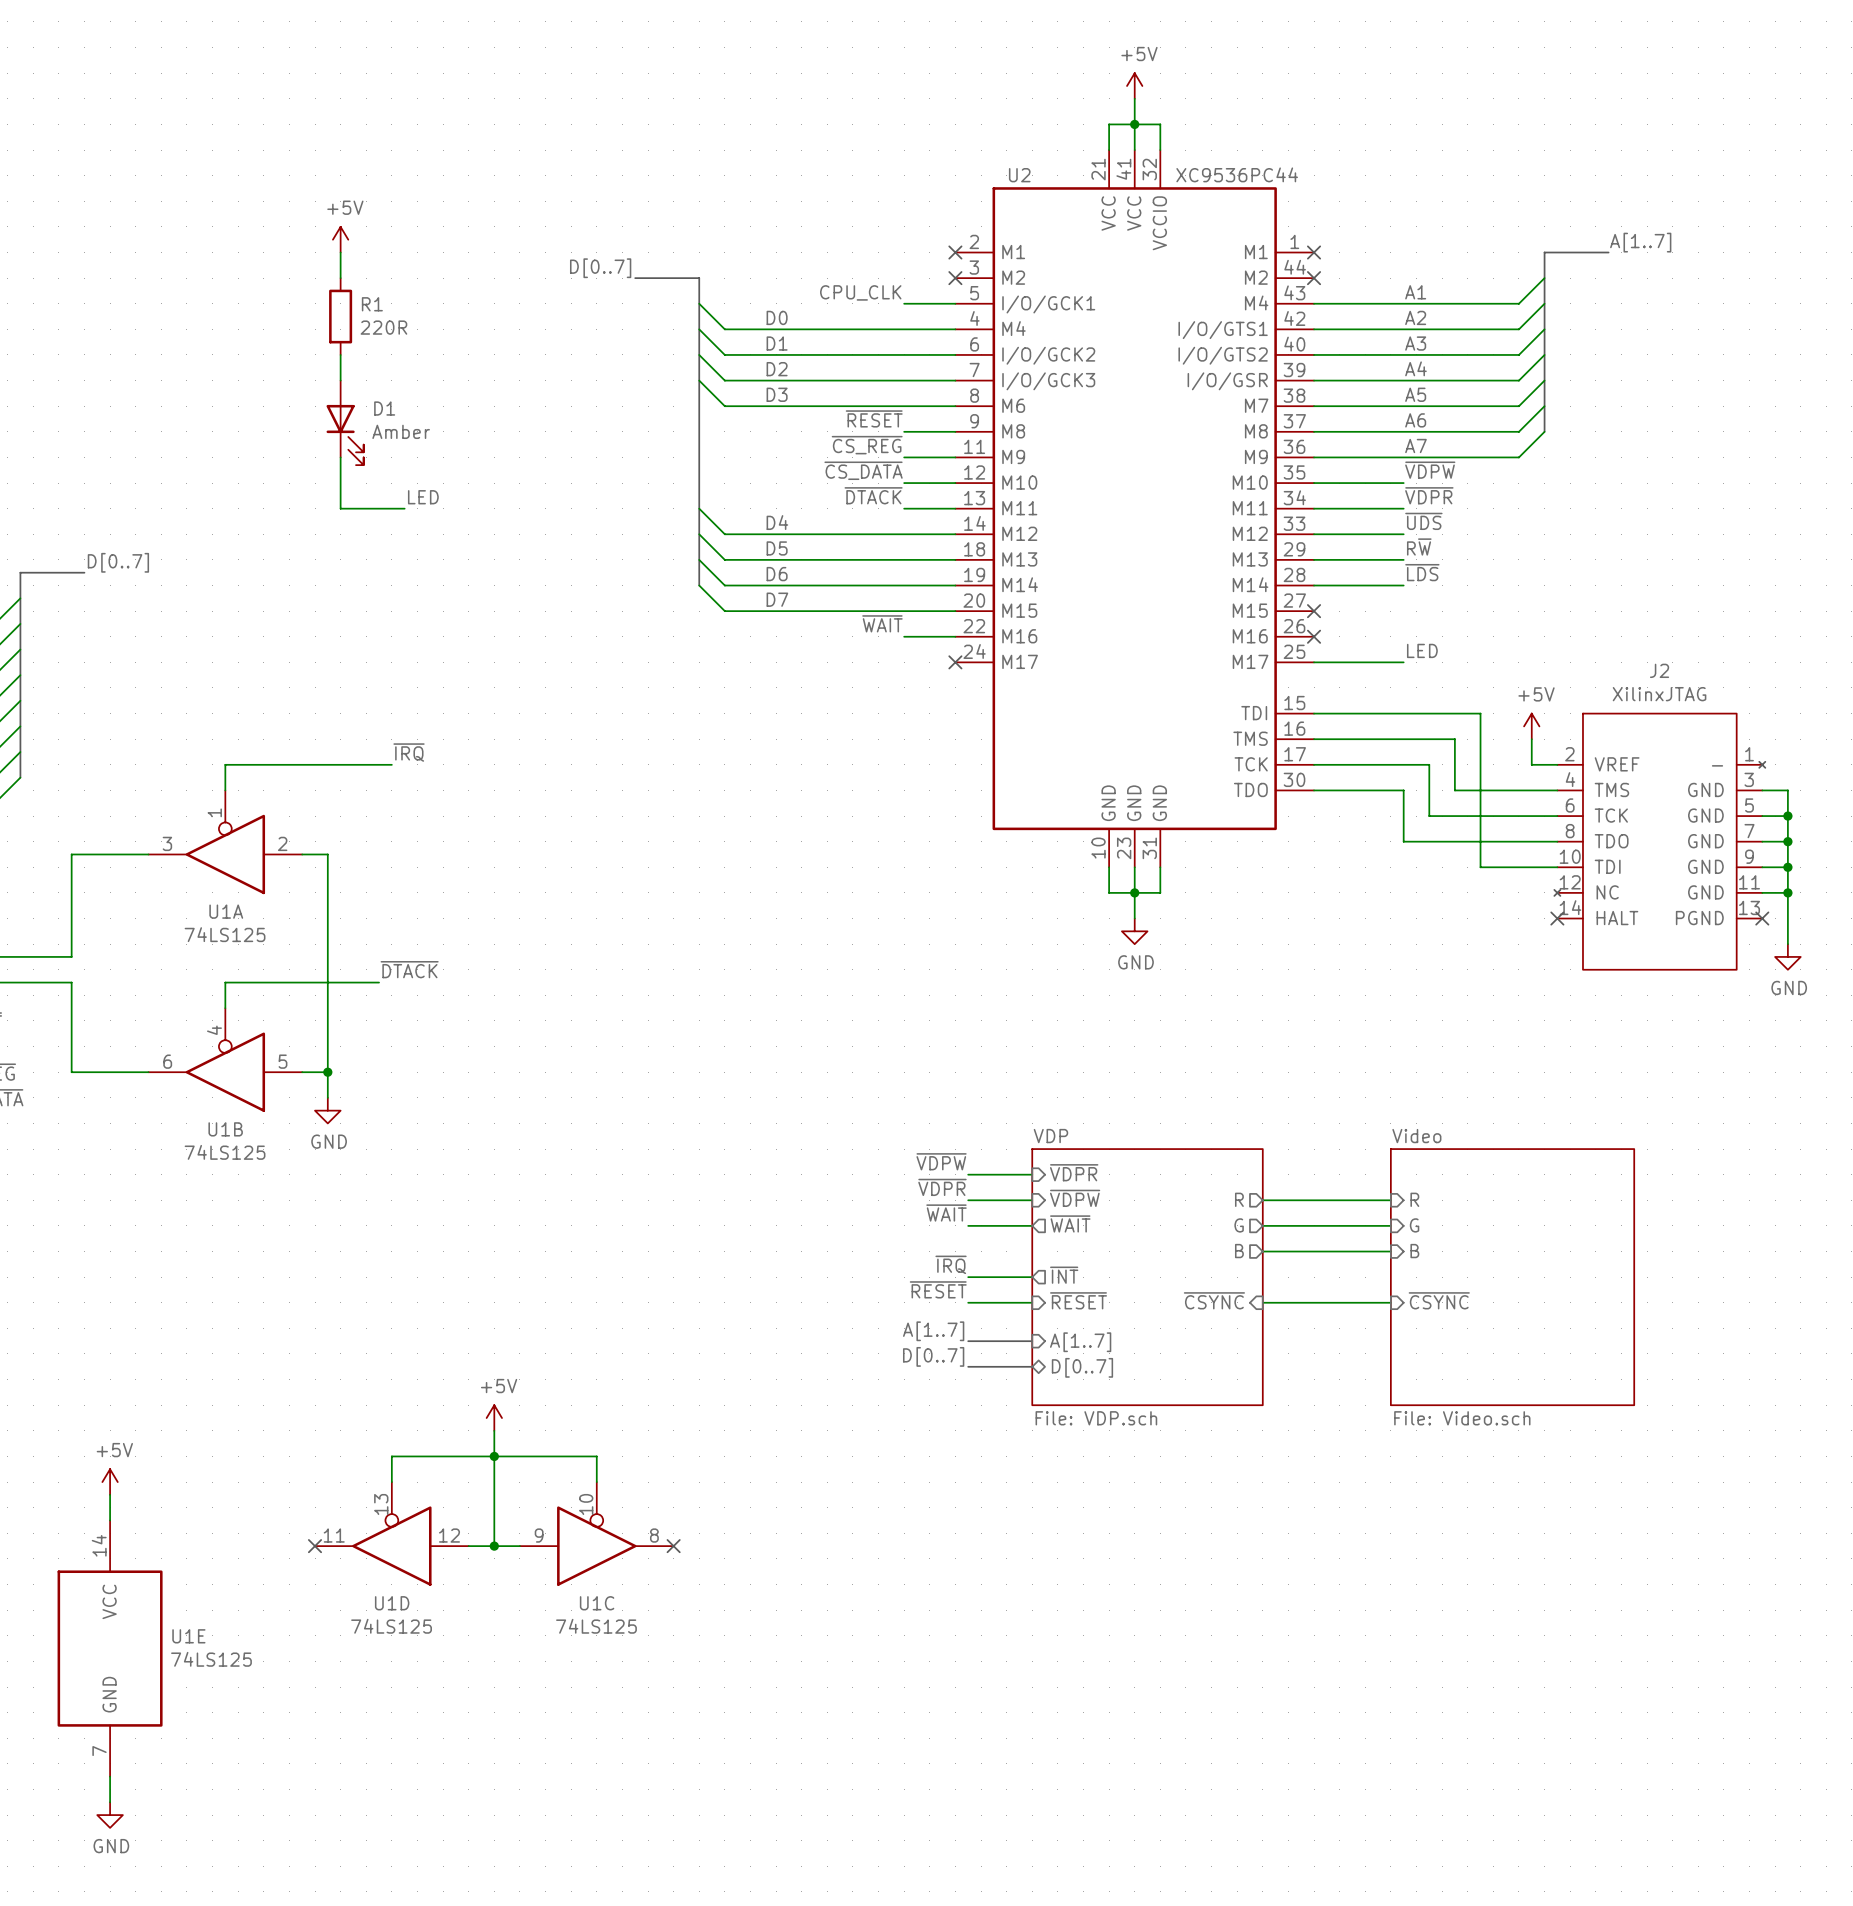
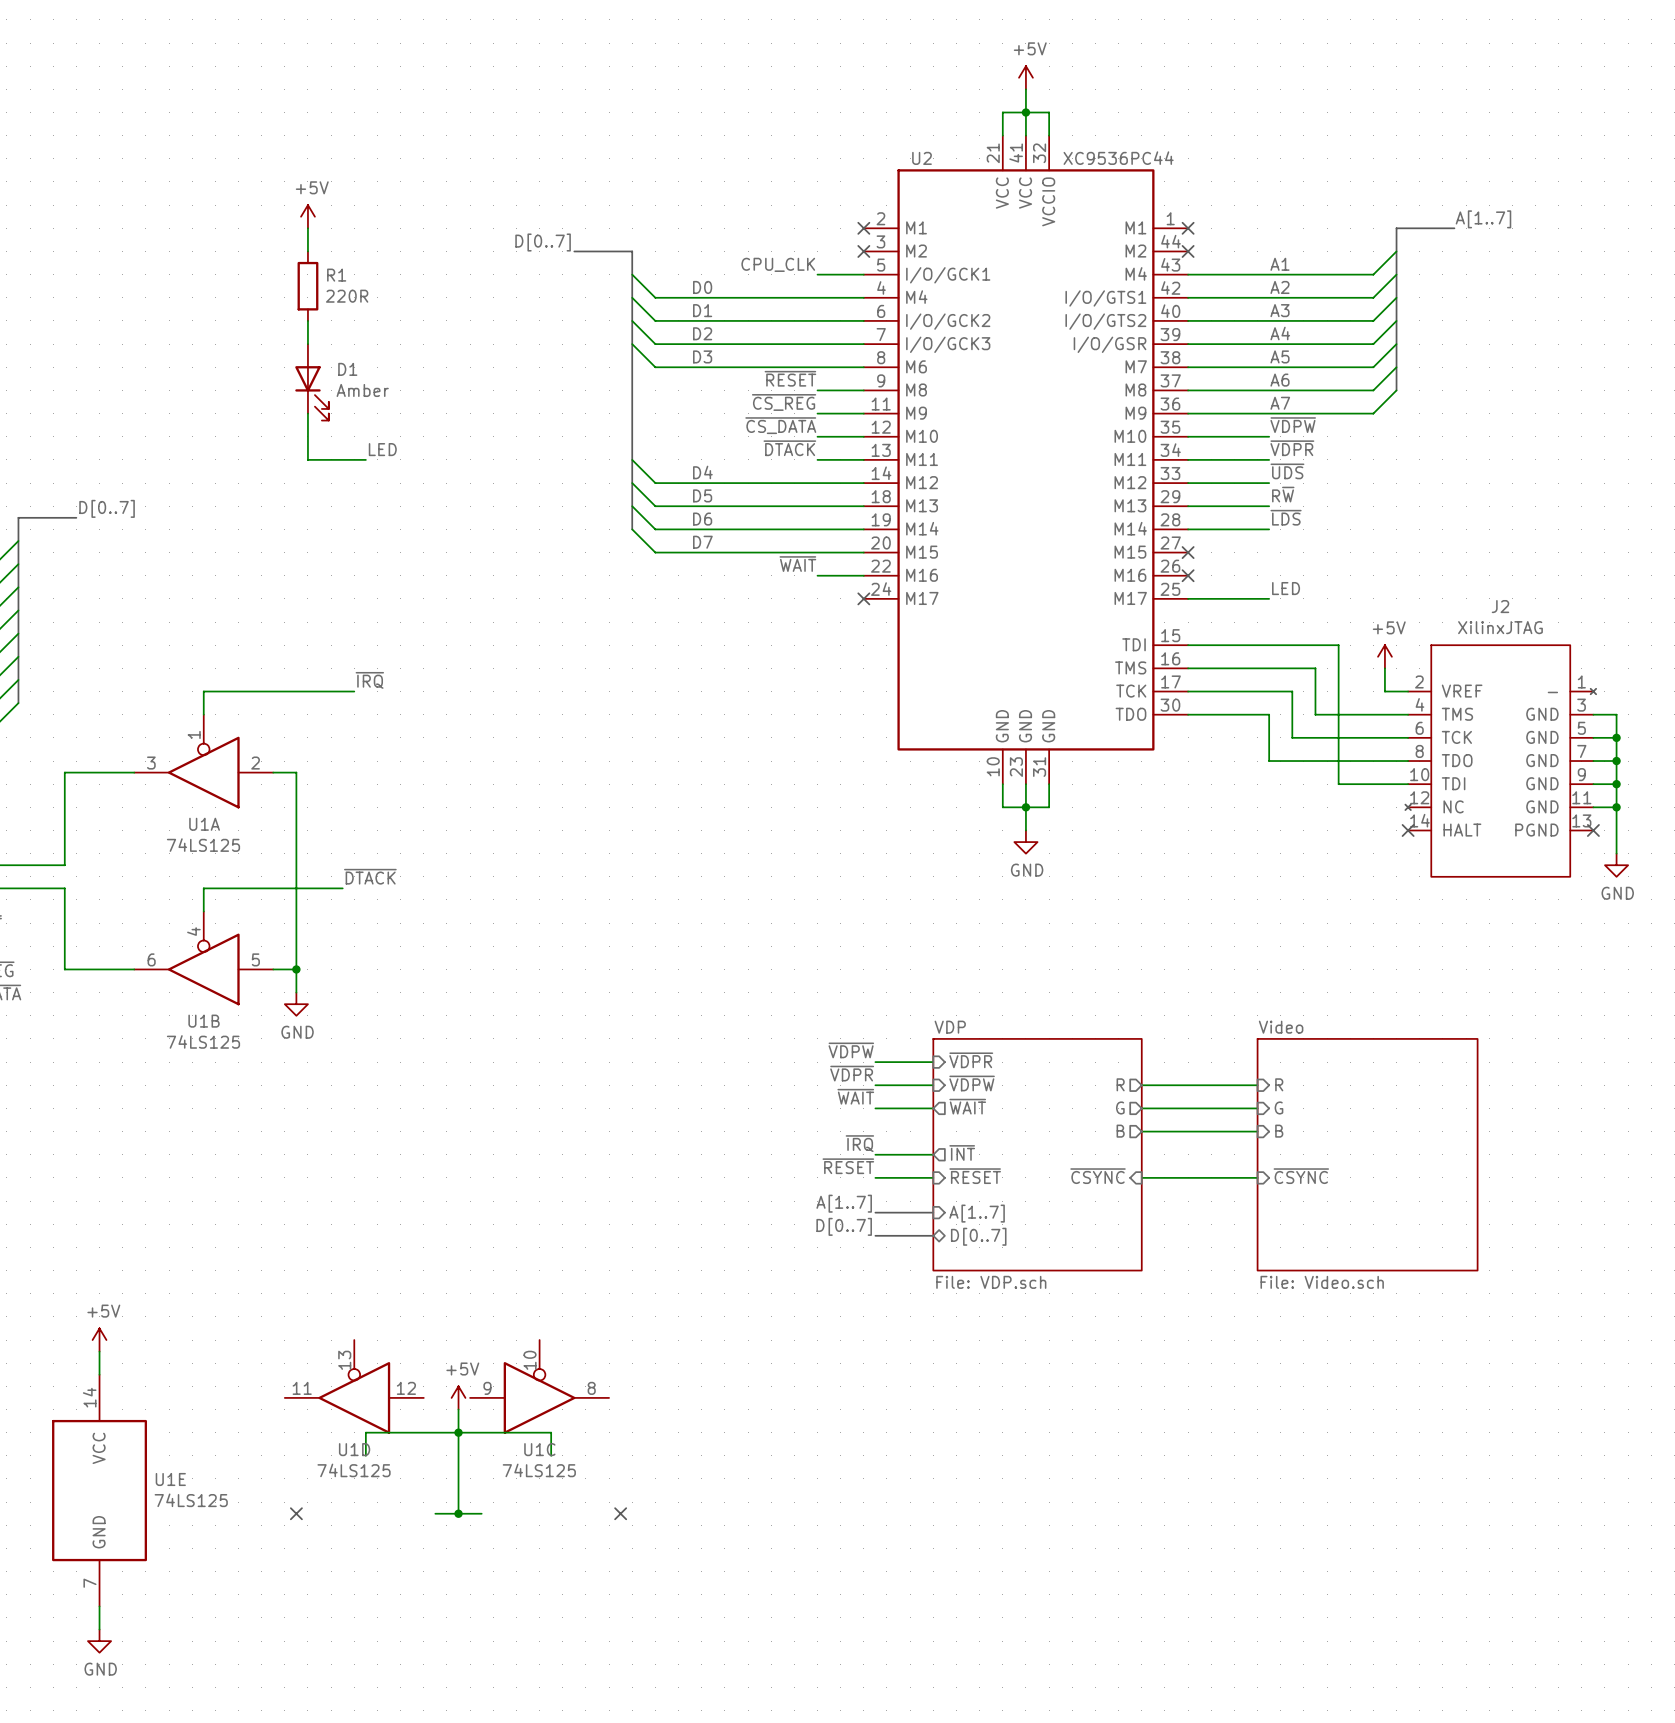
power symbol position: +5V (494, 1418) -> +5V (458, 1397)
wire: (494, 1430) (494, 1546) -> (458, 1409) (458, 1513)
junction: (494, 1456) -> none
wire: (391, 1482) (391, 1456) (596, 1456) (596, 1482) -> (365, 1455) (365, 1432) (551, 1432) (551, 1455)
no-connect mark: (315, 1546) -> none
wire: (468, 1546) (519, 1546) -> (435, 1513) (481, 1513)
junction position: (494, 1546) -> (458, 1432)
no-connect mark: (673, 1546) -> none
no-connect mark: none -> (296, 1513)
junction: none -> (458, 1513)
no-connect mark: none -> (620, 1513)

